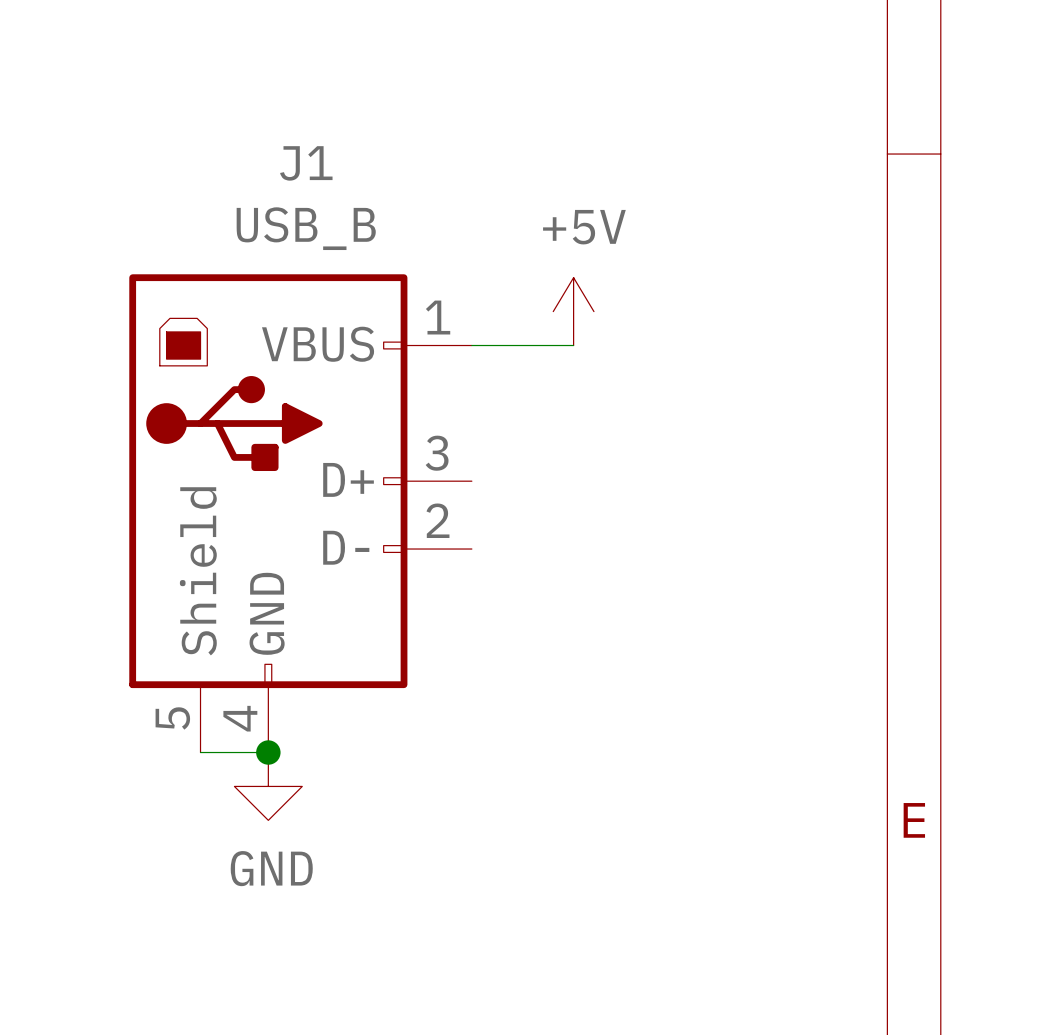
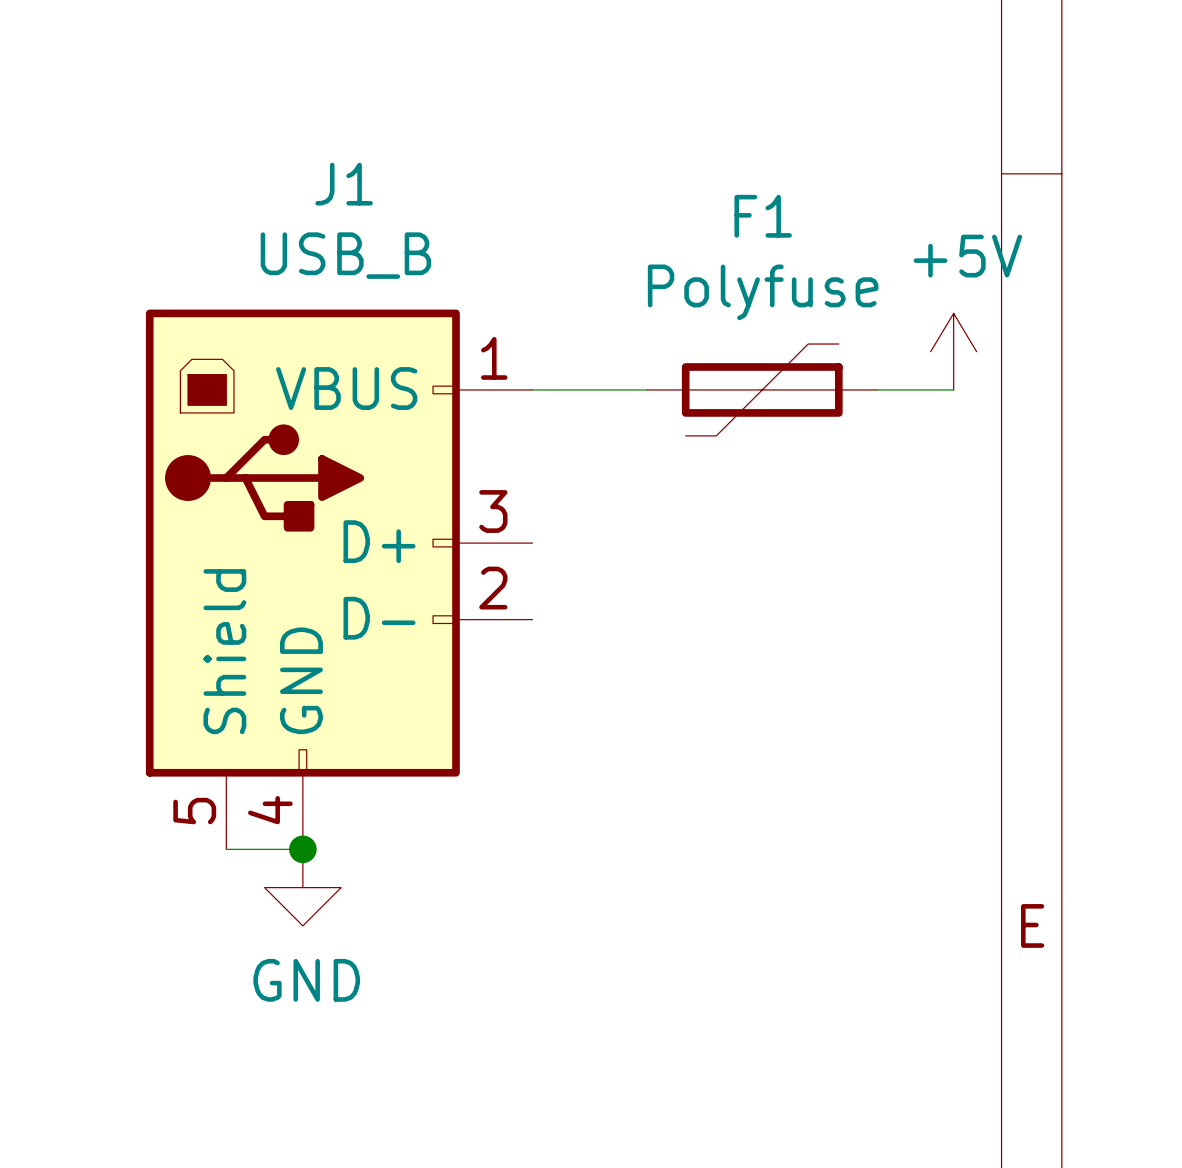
power symbol position: +5V (573, 311) -> +5V (953, 351)
F1: none -> Polyfuse (762, 389)
wire: none -> (877, 389) (953, 389)

